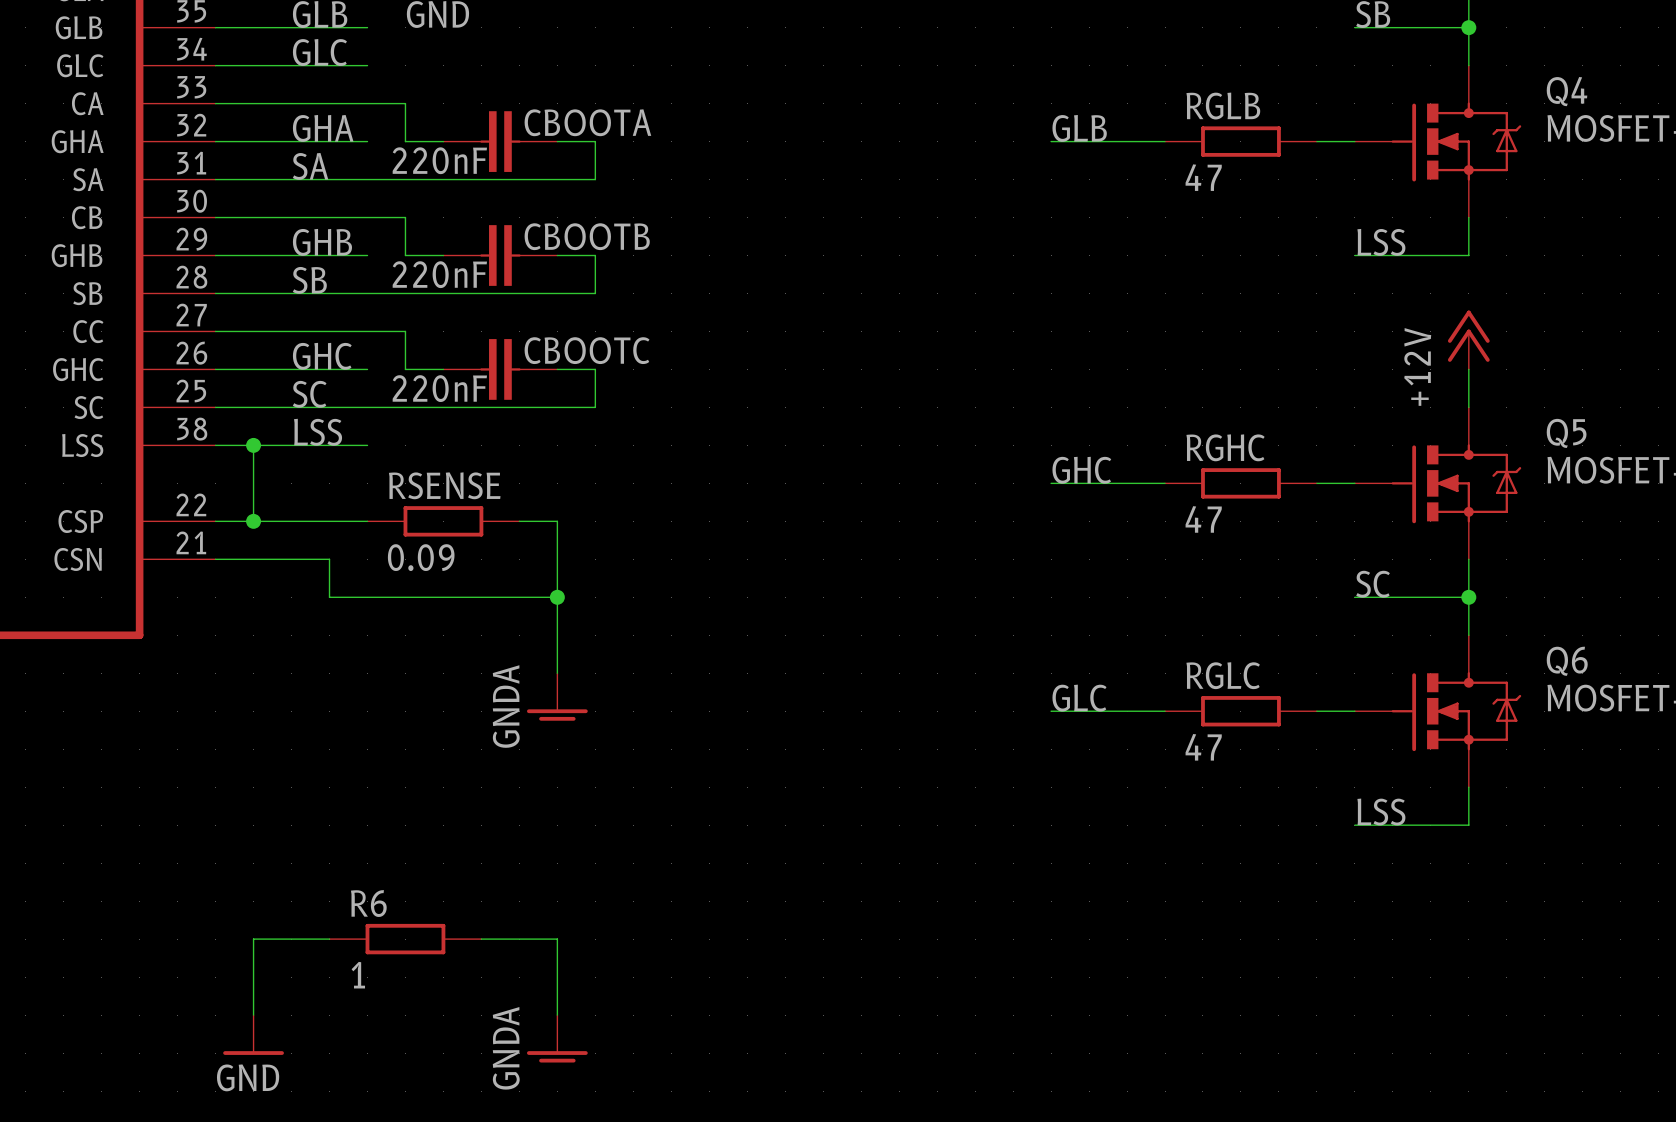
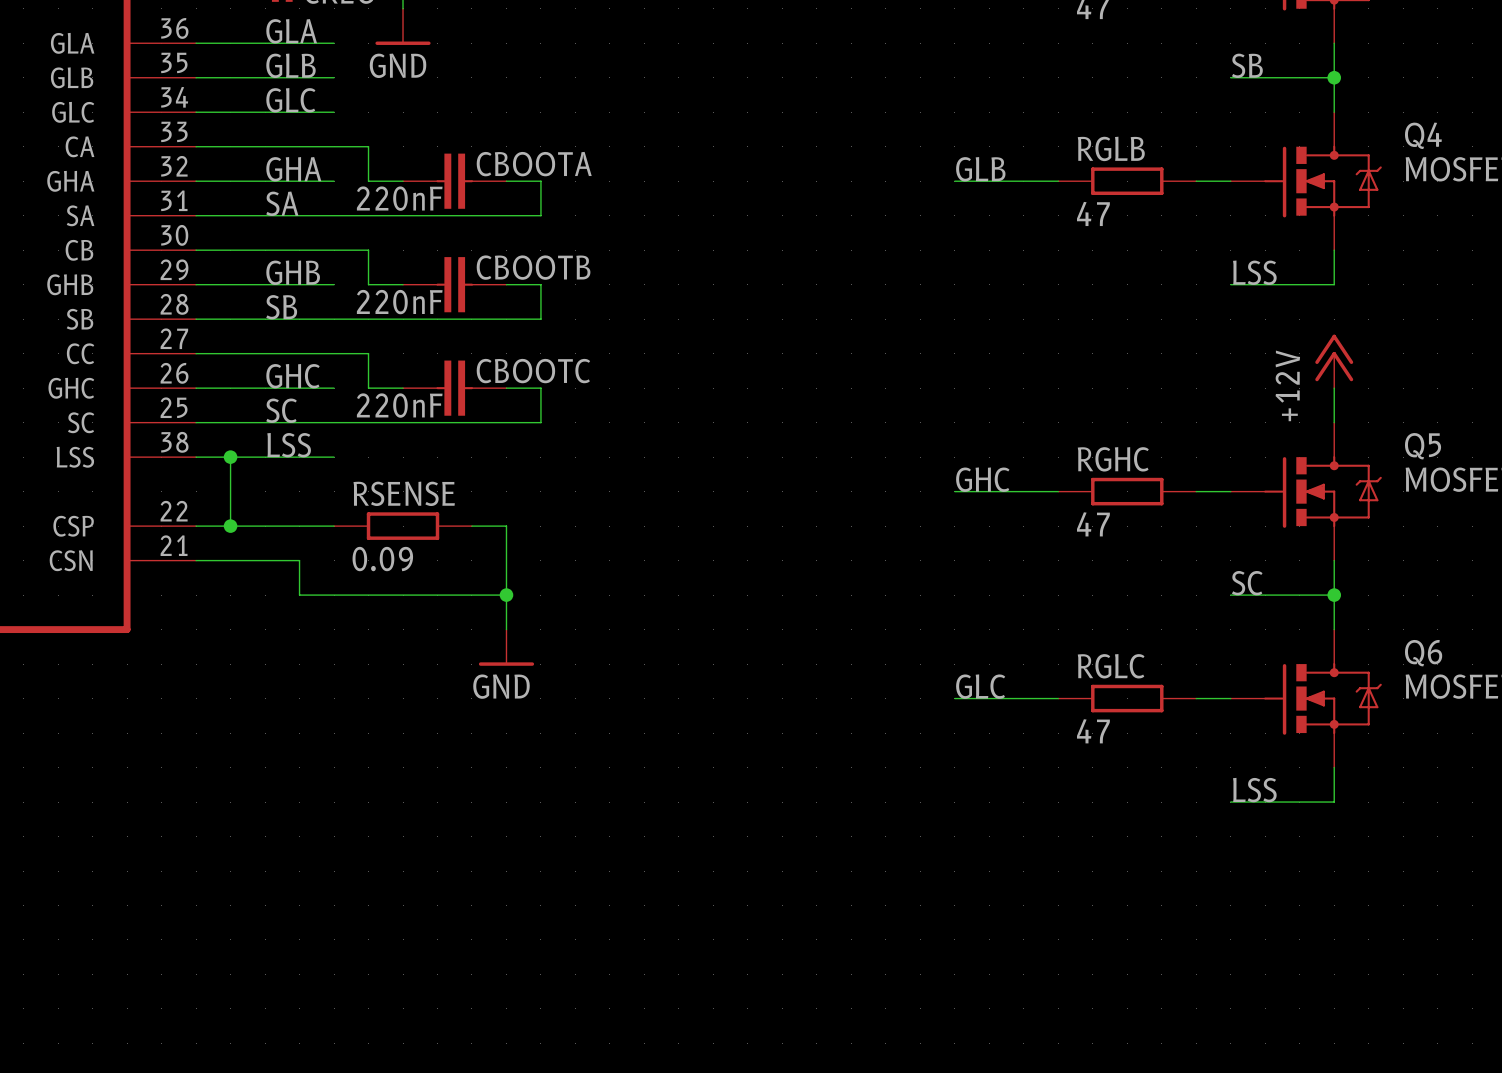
power symbol: none -> GND (506, 647)
power symbol: GNDA (557, 696) -> none
wire: (329, 939) (253, 939) (253, 1015) -> none
R6: 1 (405, 939) -> none
wire: (481, 939) (557, 939) (557, 1015) -> none
power symbol: GND (253, 1034) -> none
power symbol: GNDA (557, 1038) -> none

